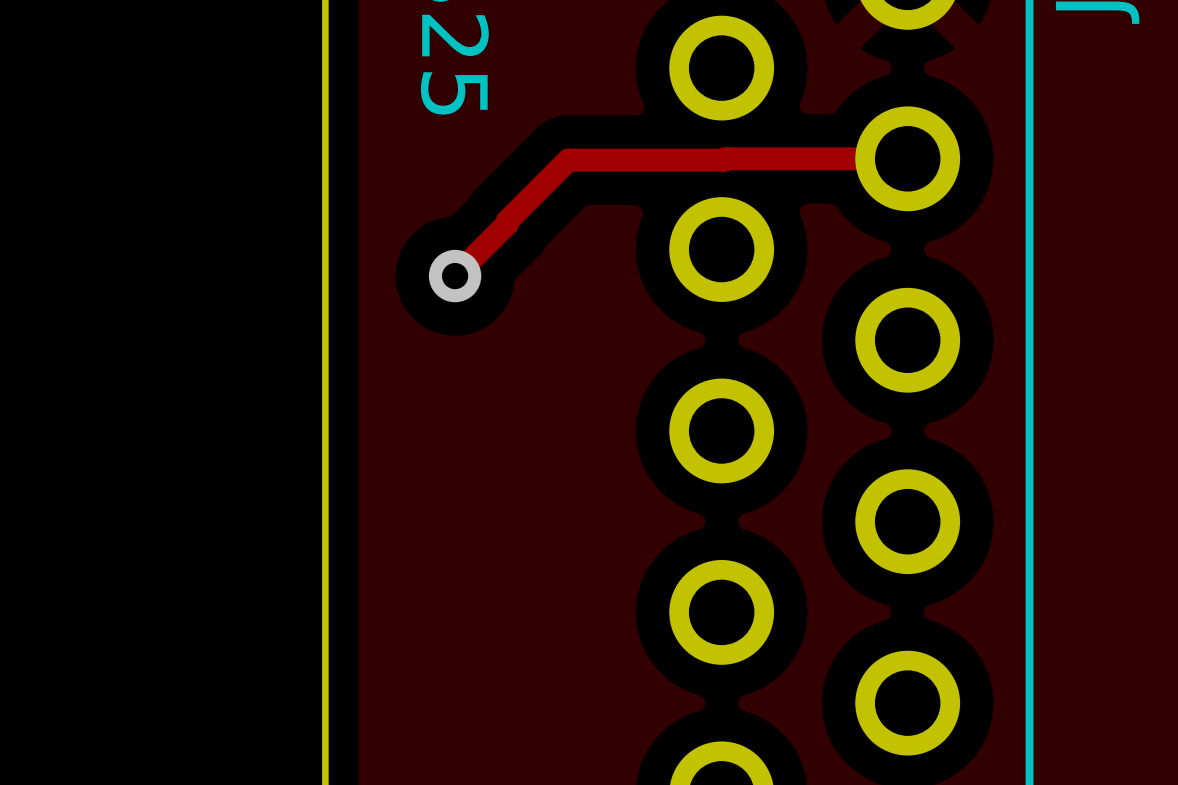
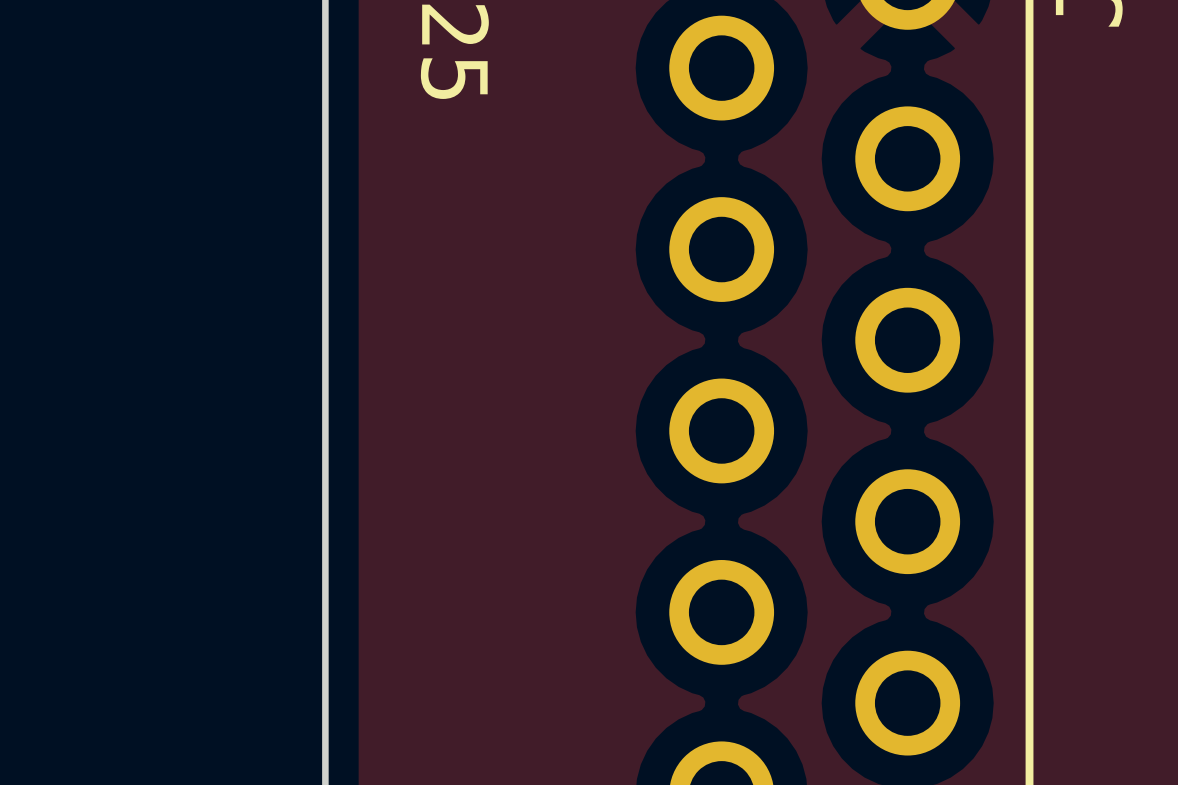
track: (907, 158) (568, 160) (455, 276) -> none
via: (455, 276) -> none

